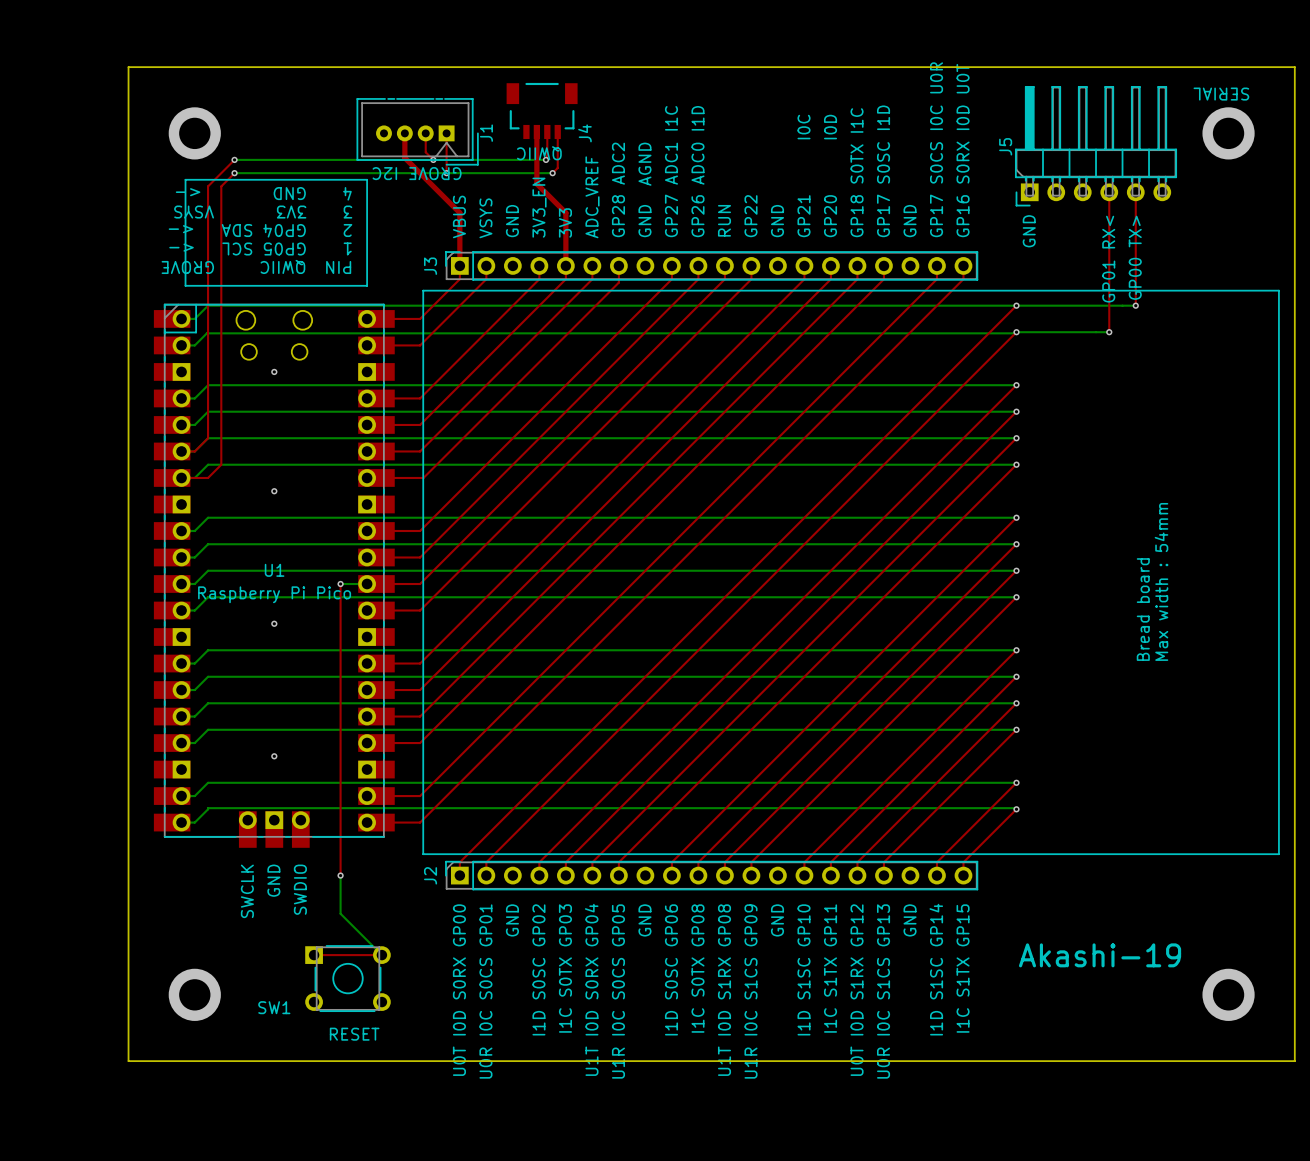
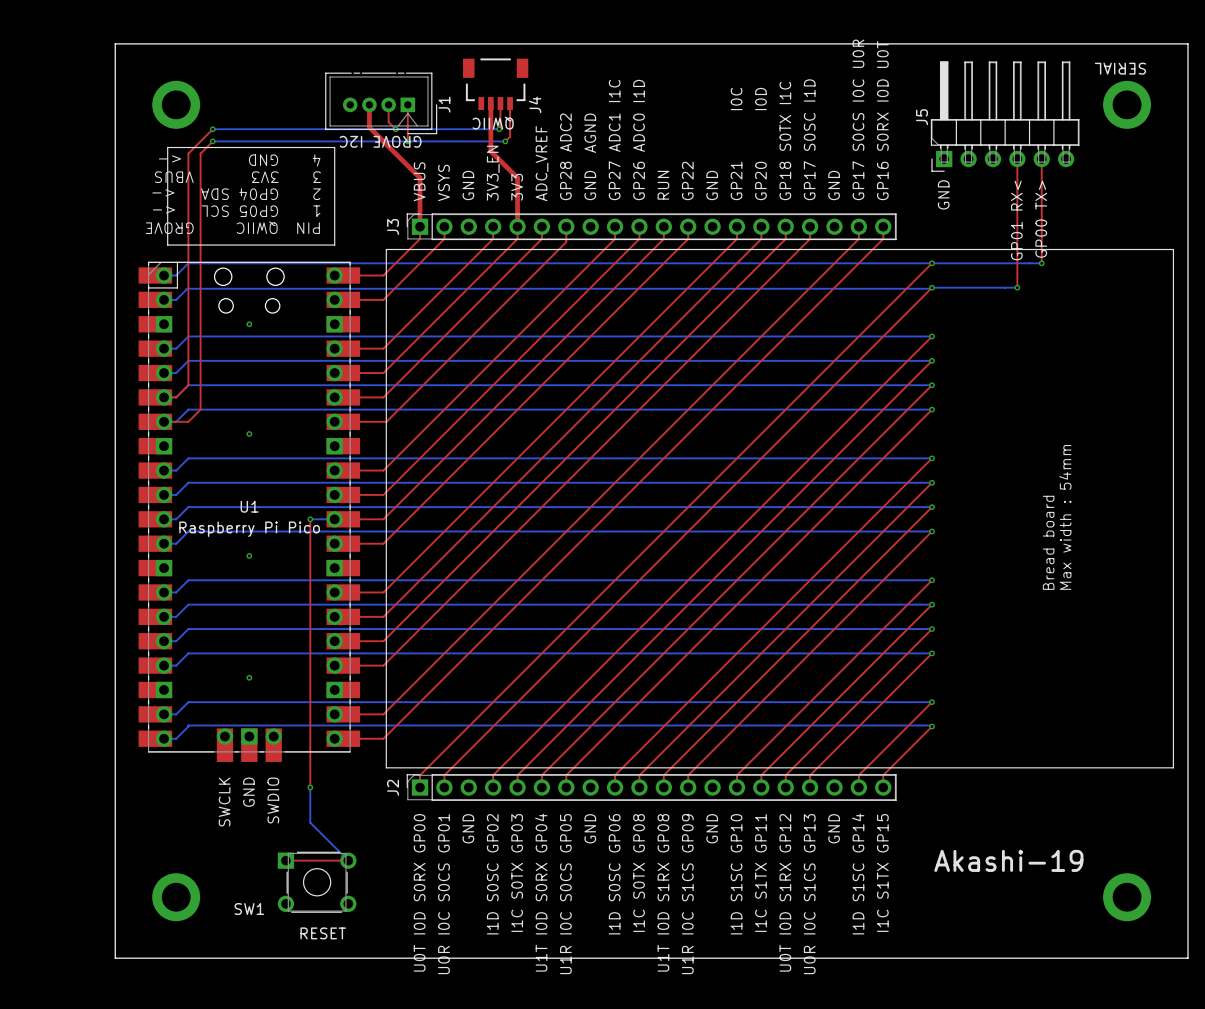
text: 3 3V3 VSYS (263, 212) -> 3 3V3 VBUS (237, 177)

